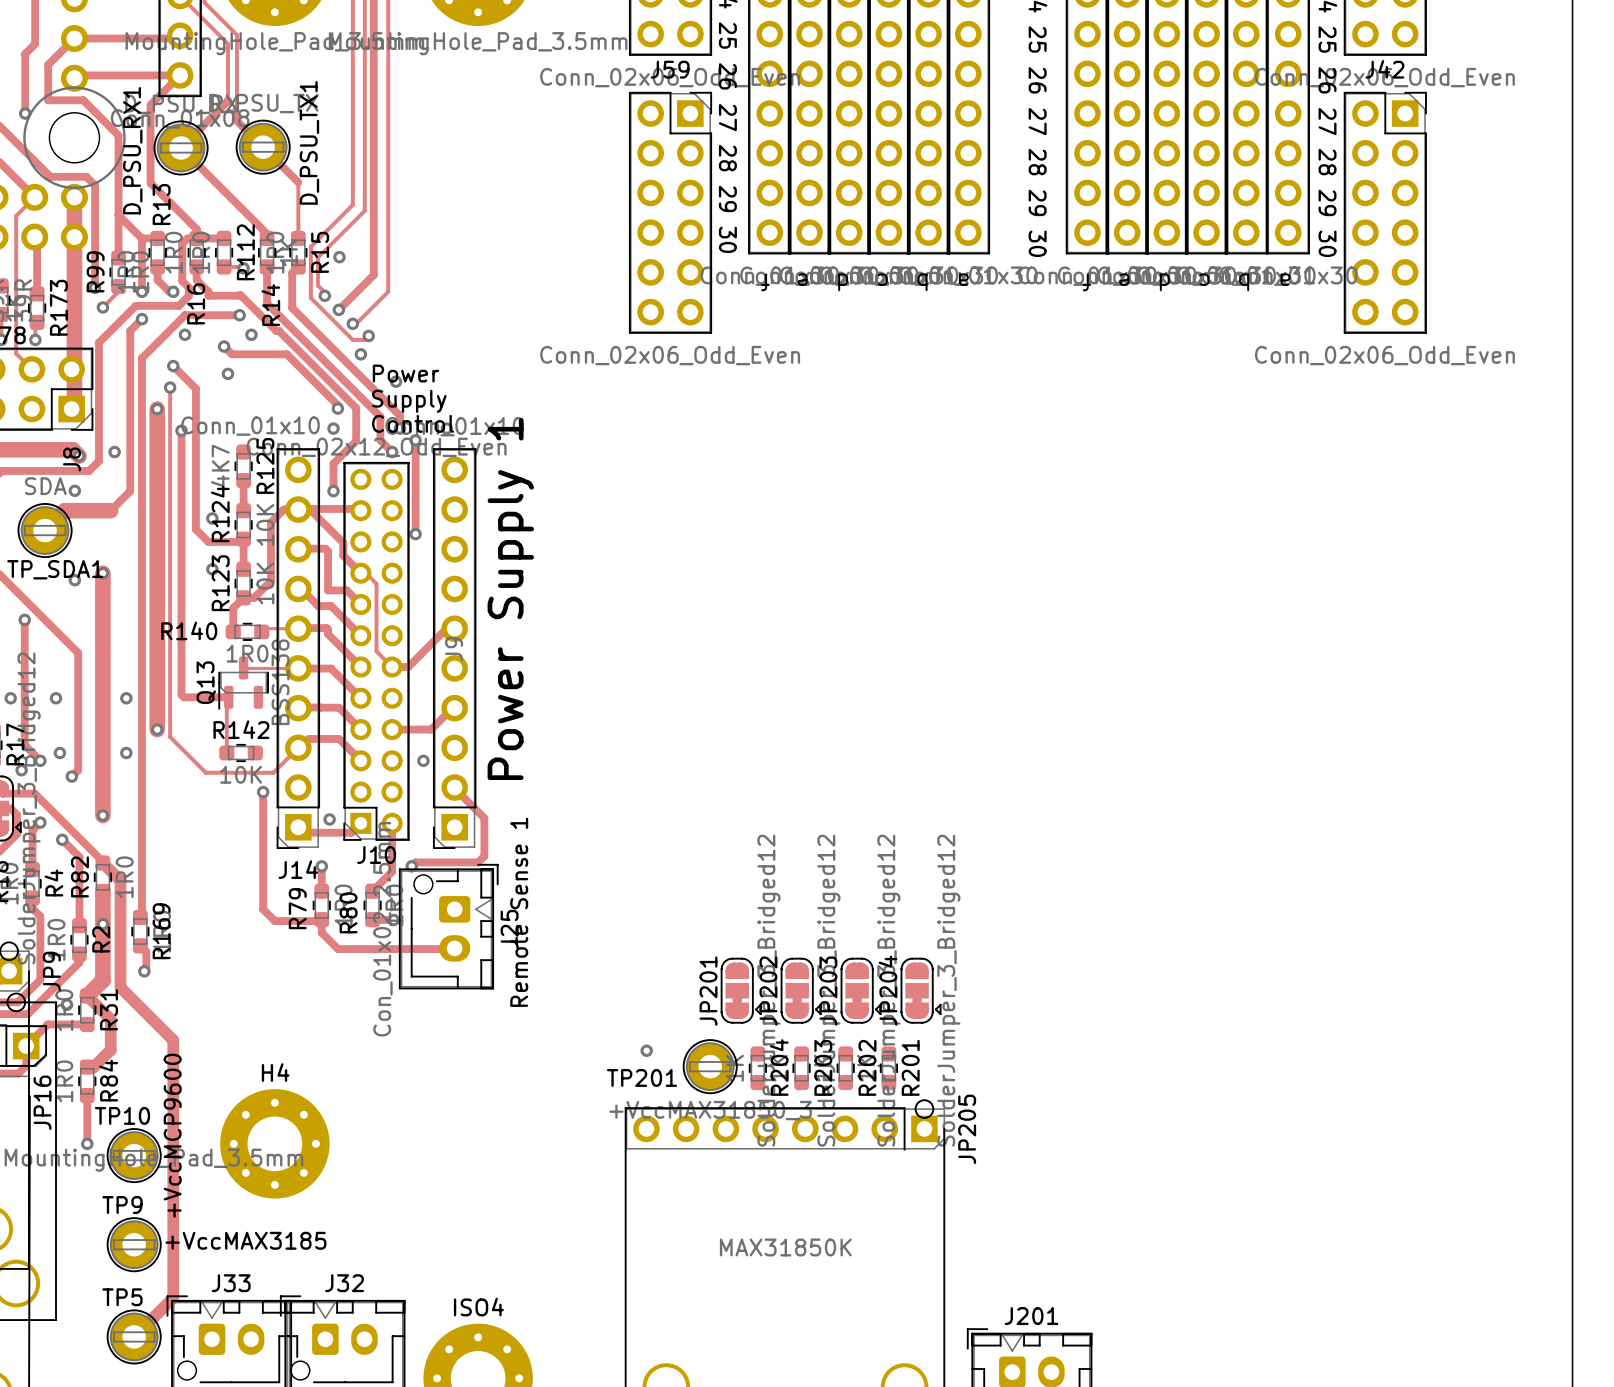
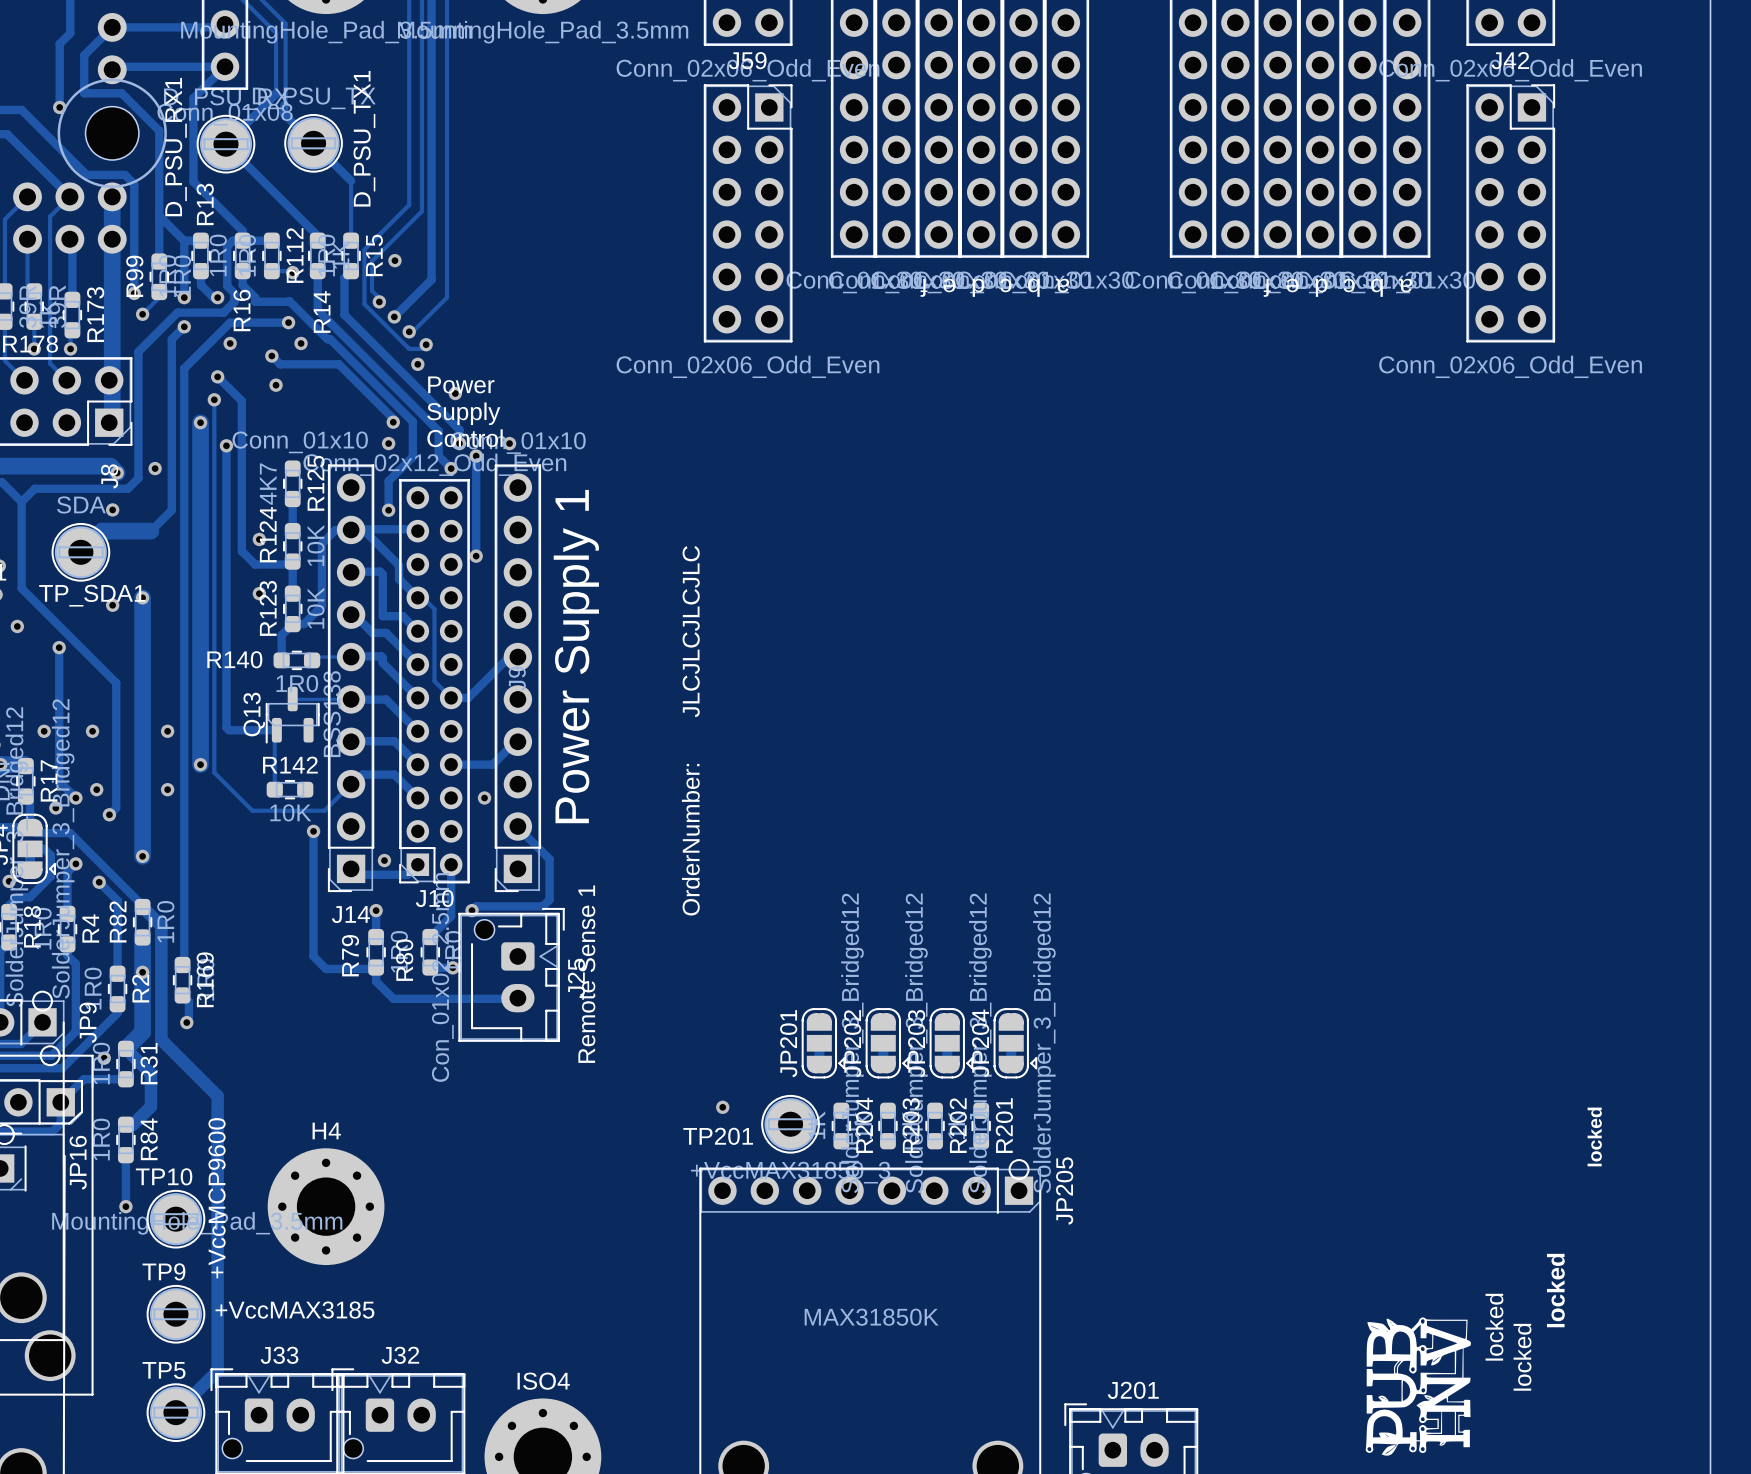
text: none -> JLCJLCJLCJLC (691, 631)
text: none -> OrderNumber: (690, 839)
text: none -> locked (1594, 1136)
text: none -> locked (1555, 1290)
drawing: none -> [1365, 1317, 1471, 1456]
text: none -> locked (1494, 1327)
text: none -> locked (1522, 1357)

